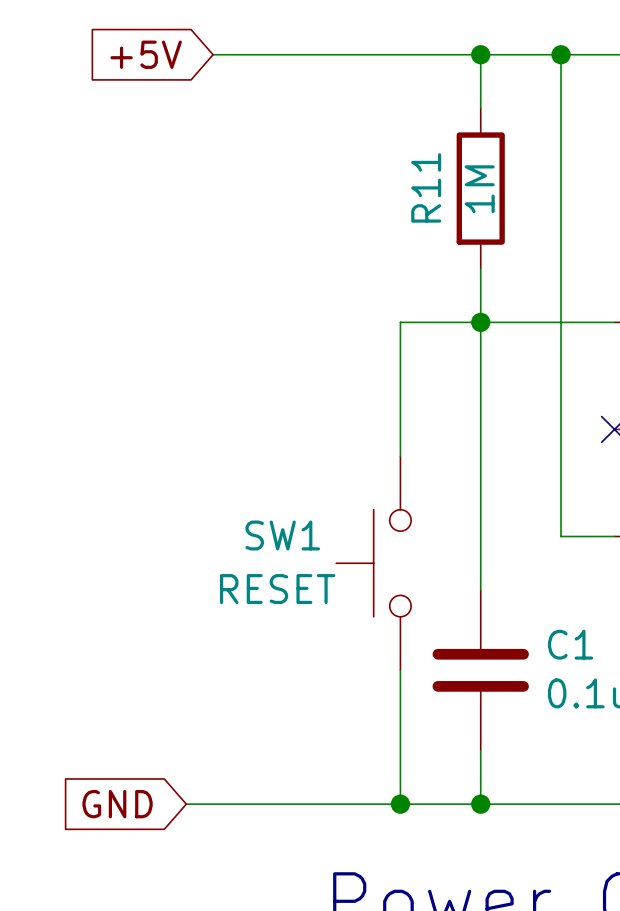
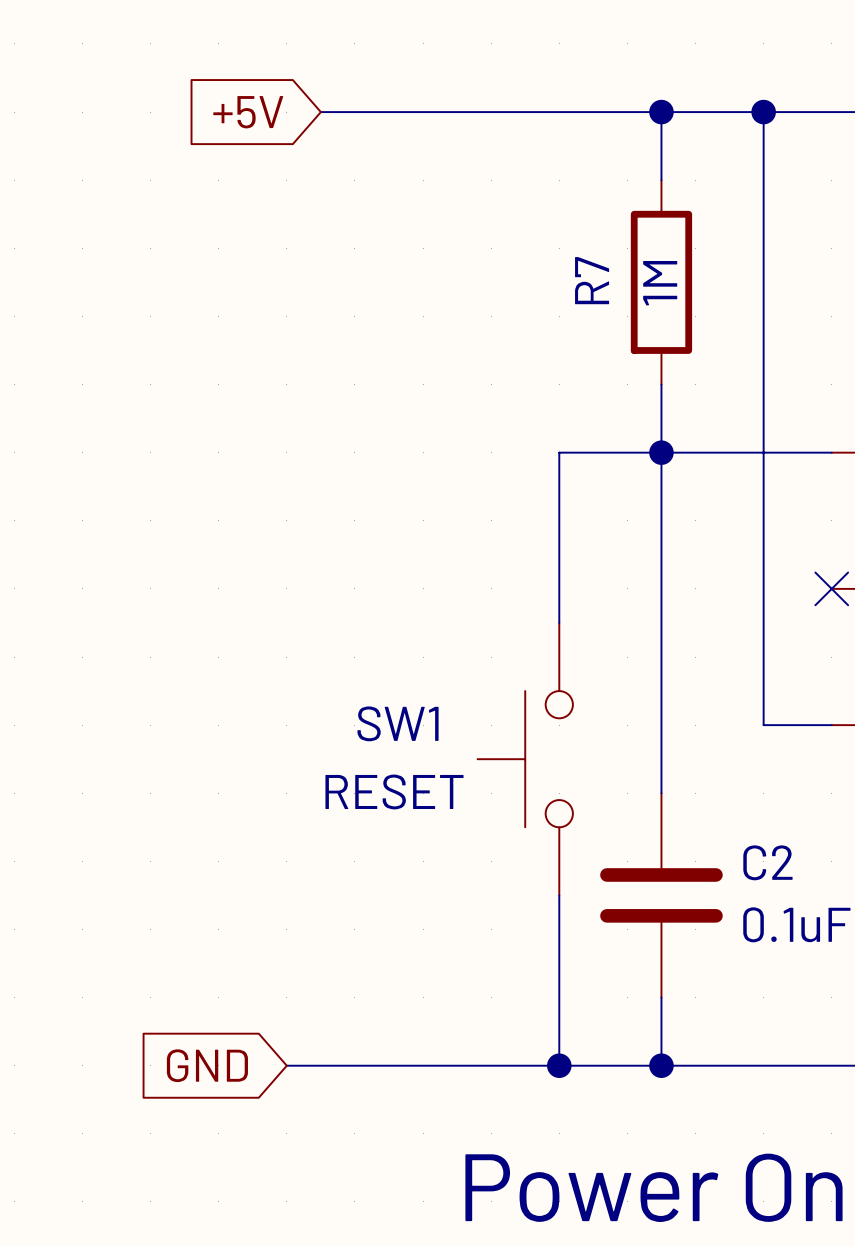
R11 name: R11 (426, 187) -> R7 (592, 280)
C1 name: C1 (570, 644) -> C2 (767, 862)

